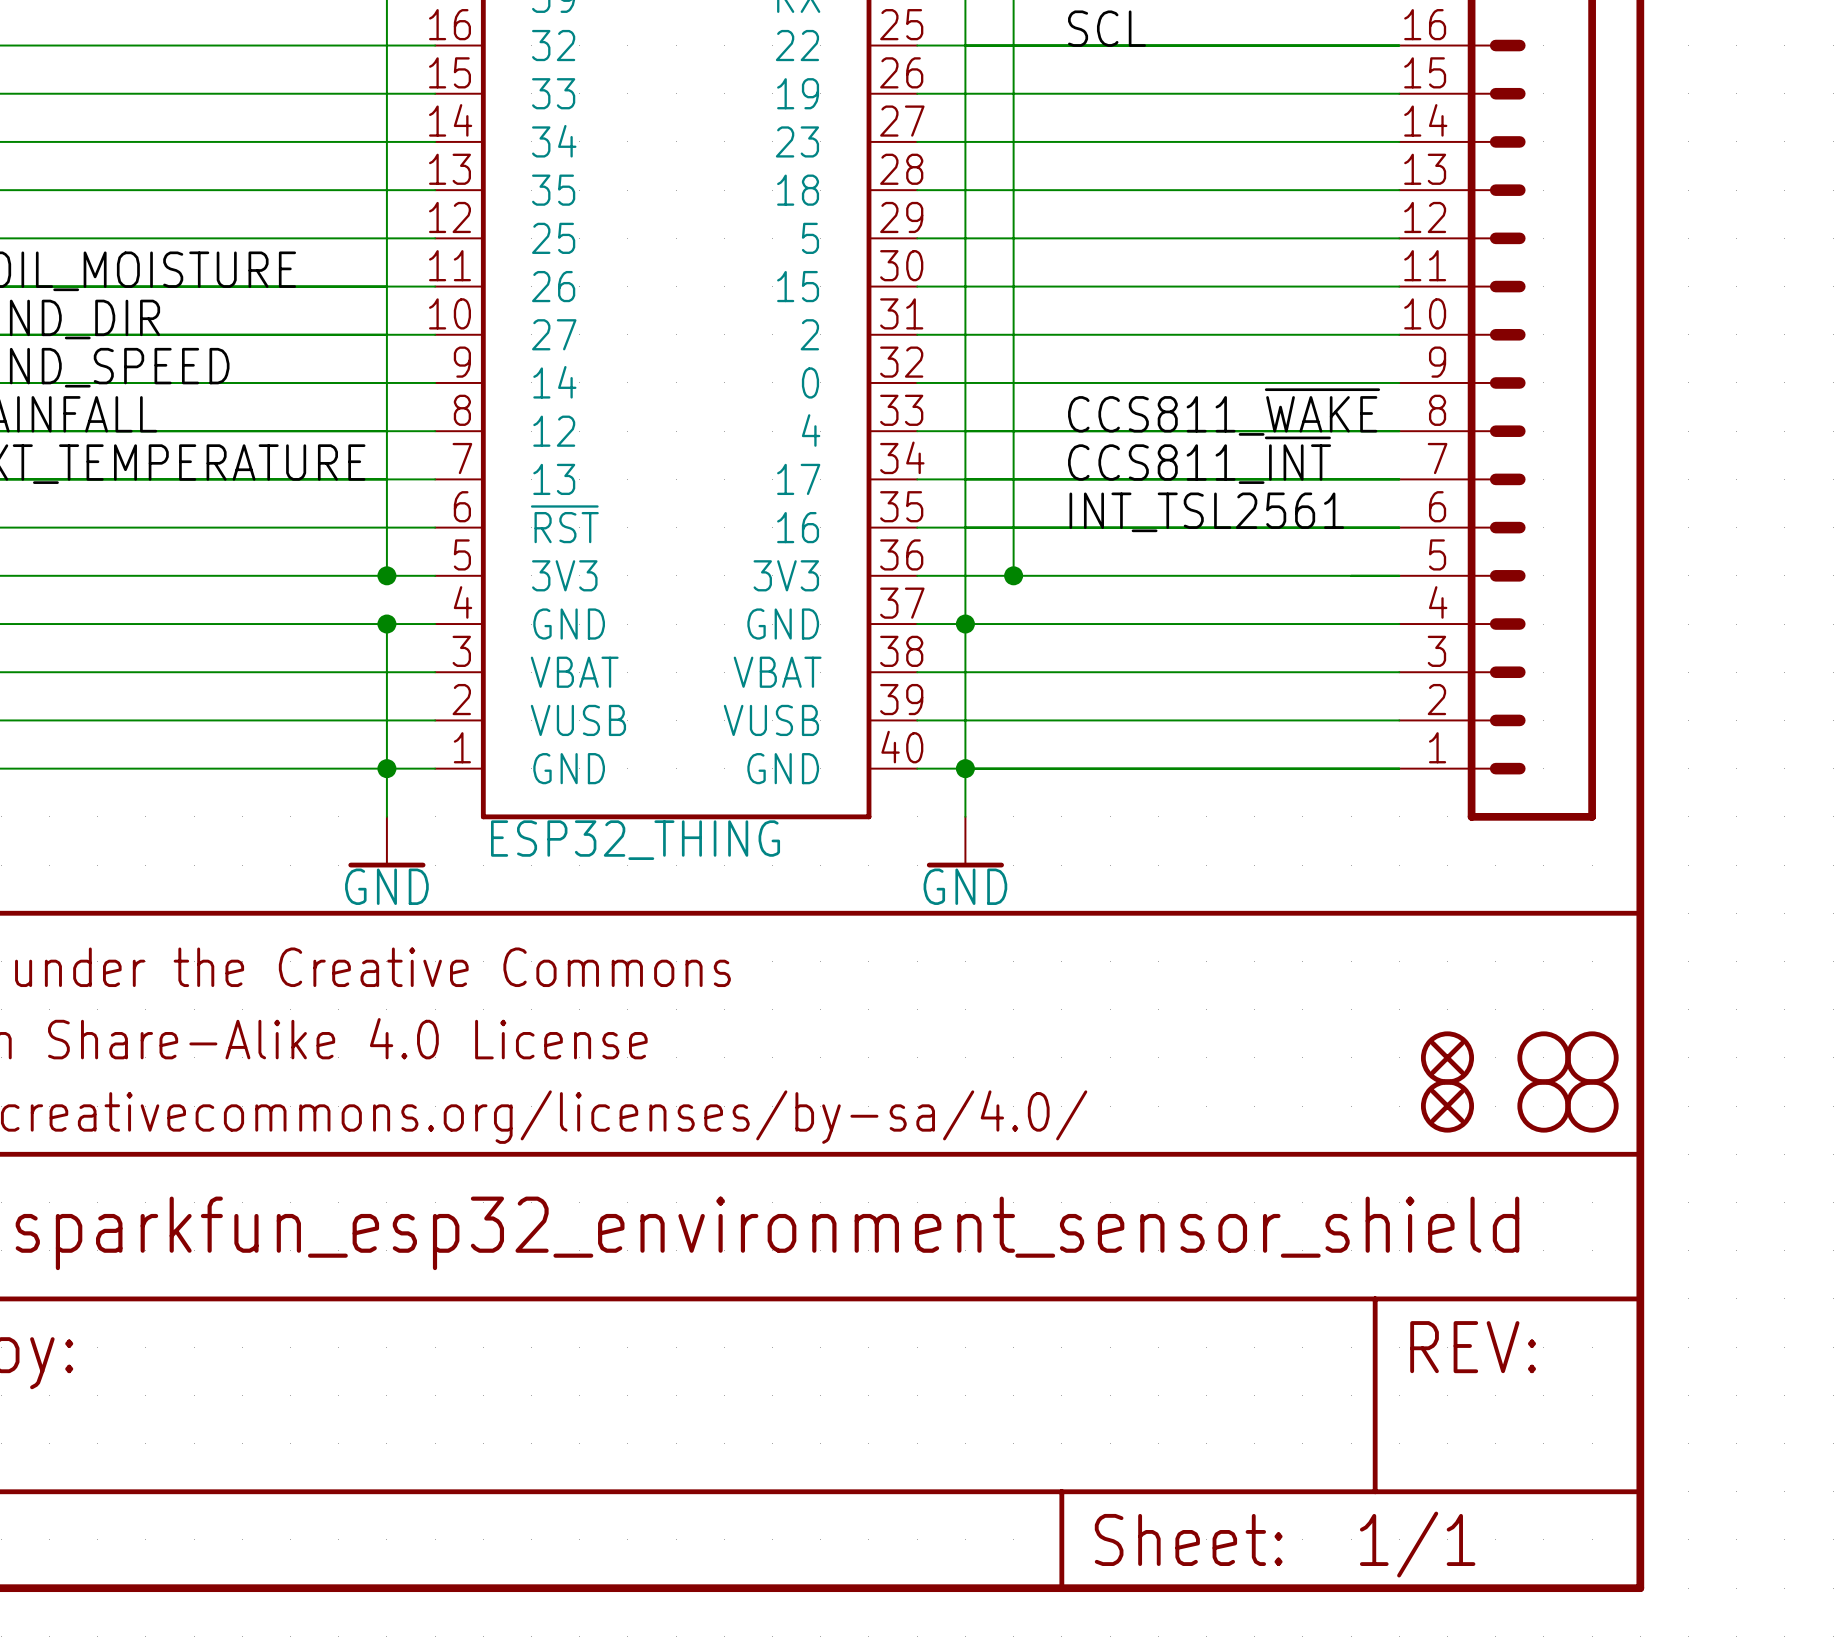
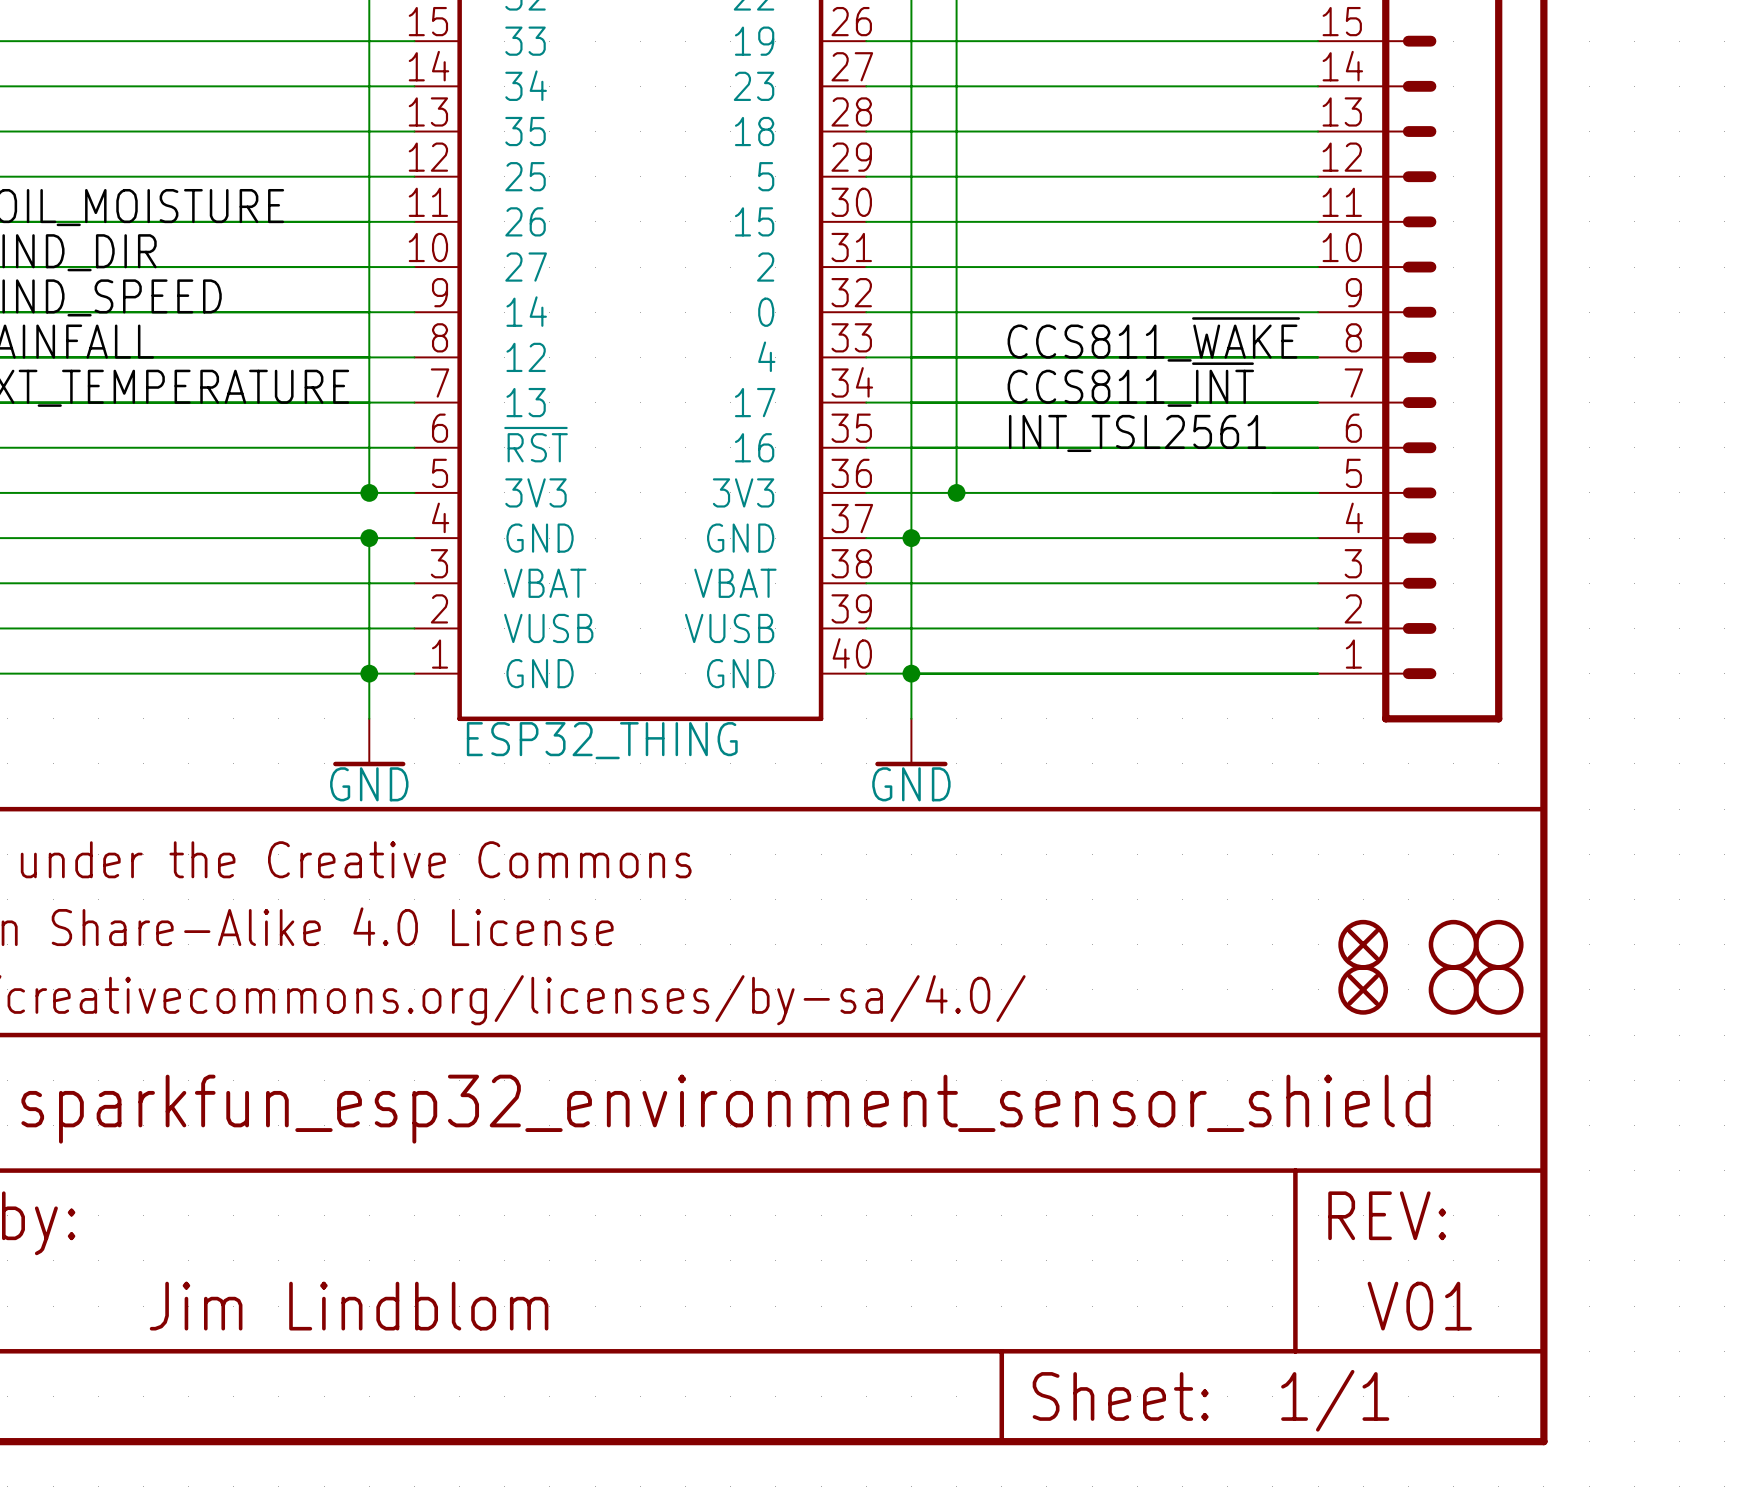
text: none -> Jim Lindblom (349, 1306)
text: none -> V01 (1419, 1306)

